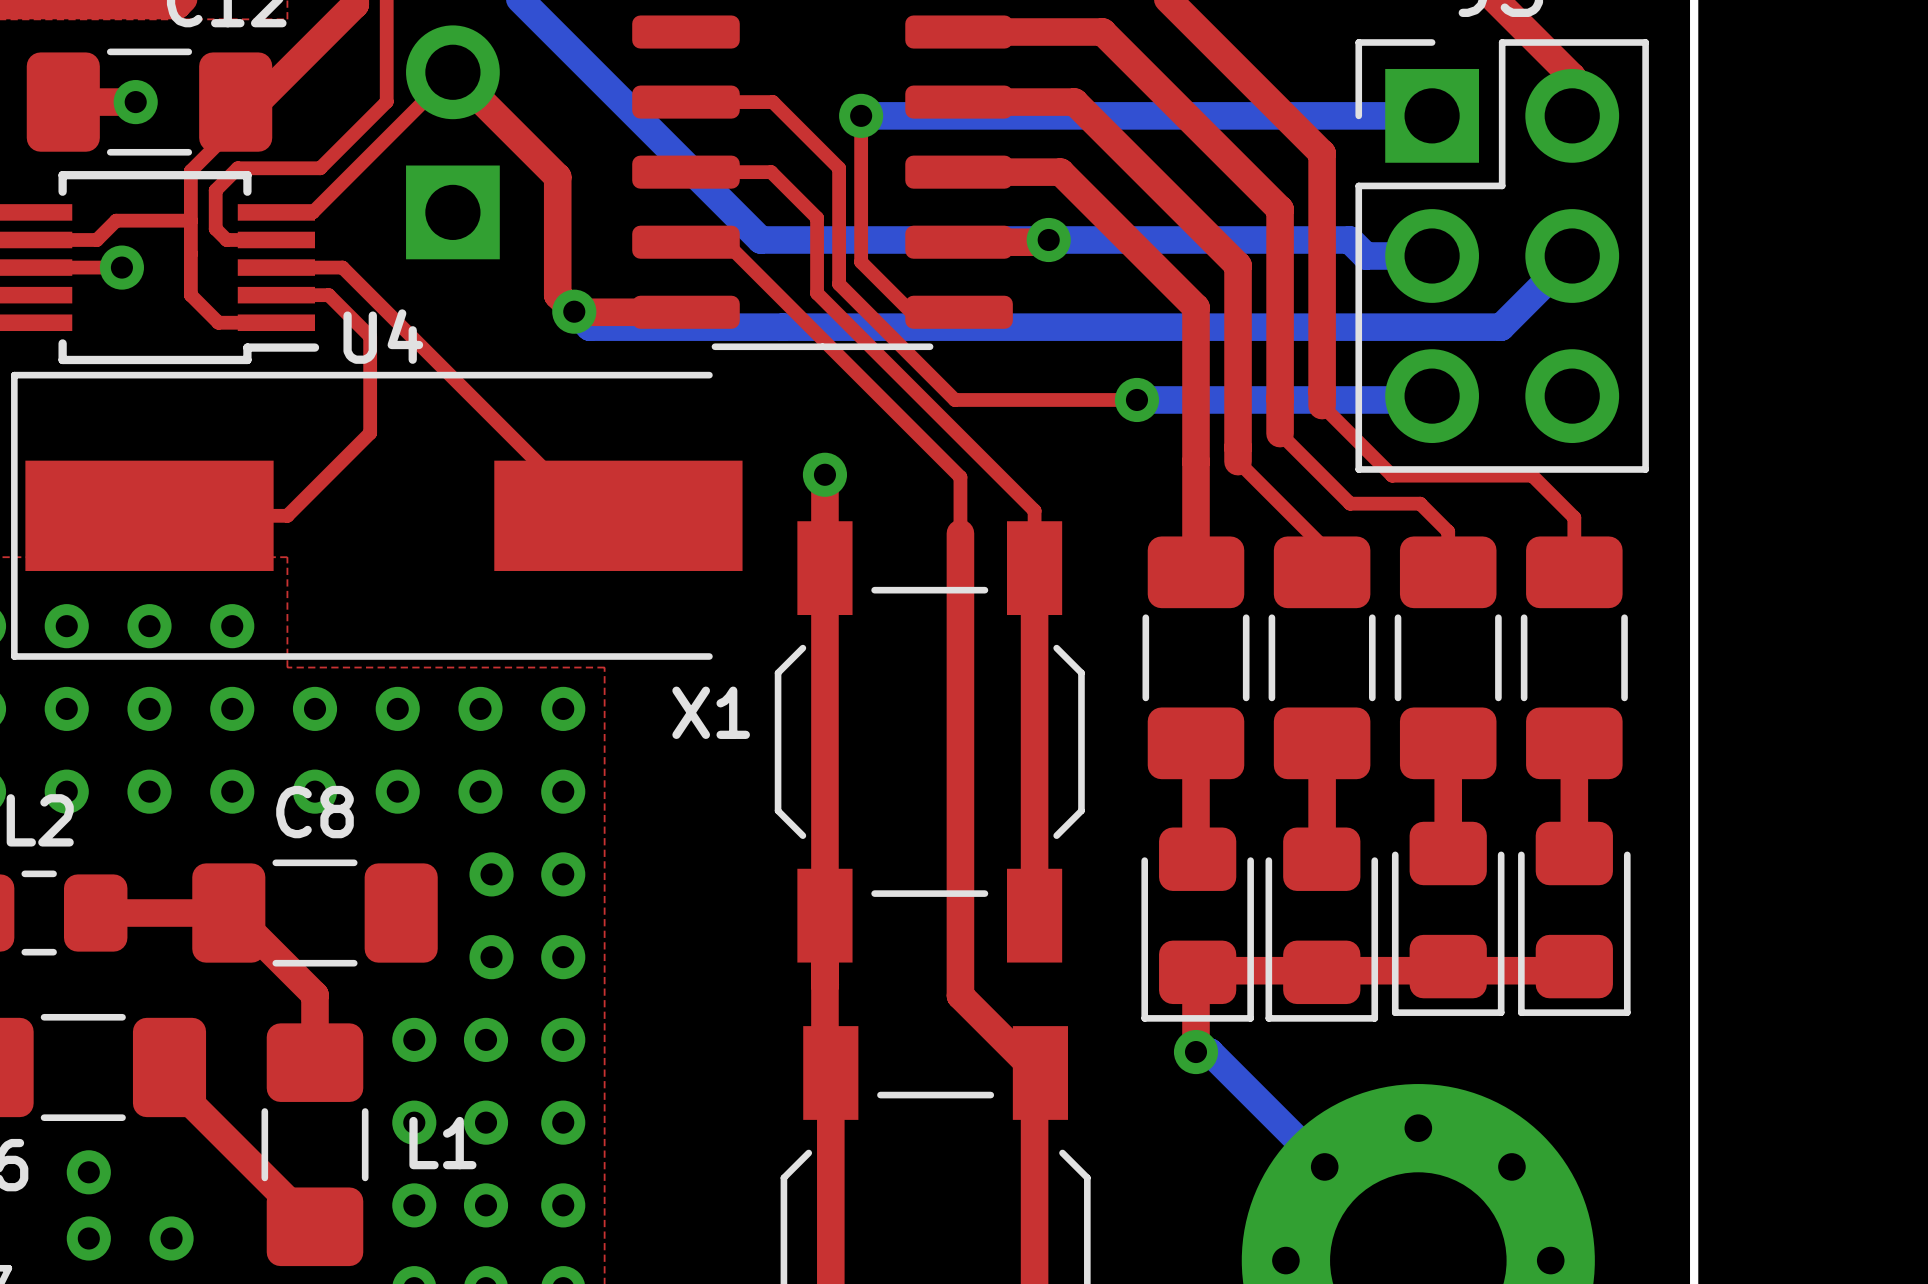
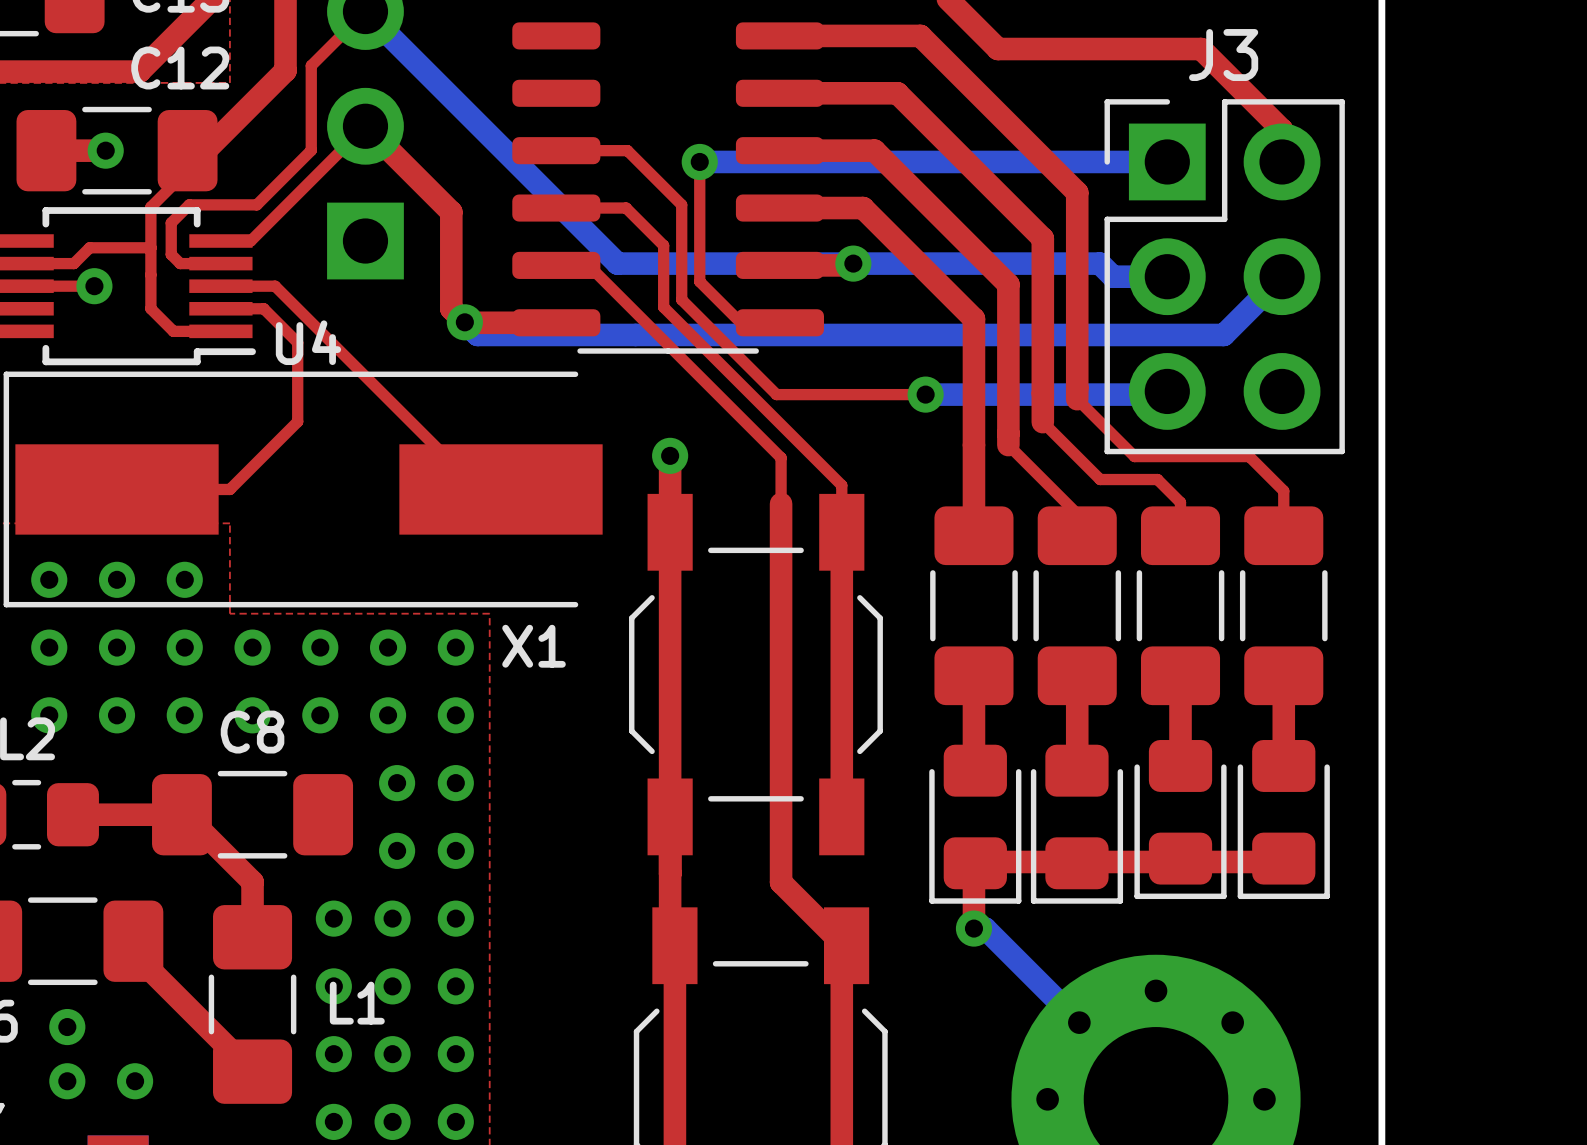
X1 name position: X1 (711, 712) -> X1 (534, 646)

